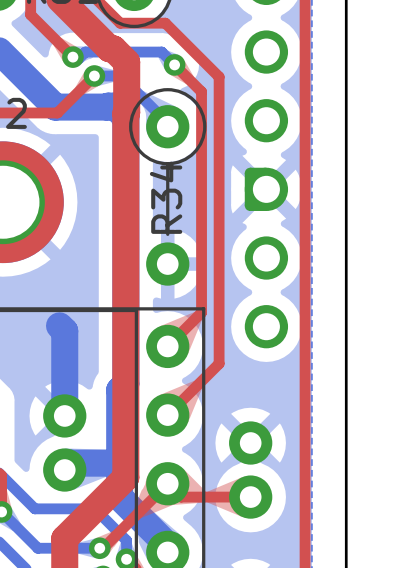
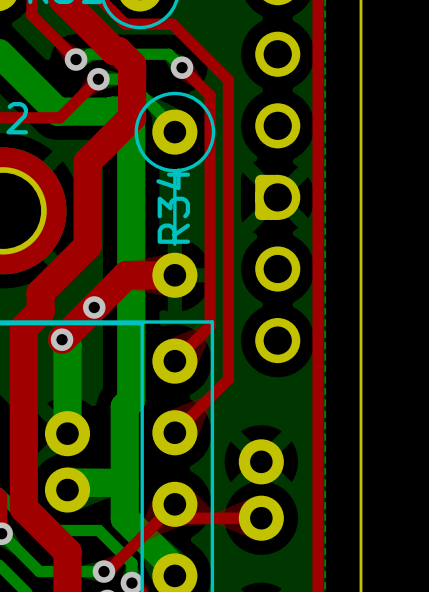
top track: (125, 113) (125, 477) (64, 538) -> (131, 118) (87, 161) (87, 245) (40, 292) (40, 311) (23, 328) (23, 508) (67, 551) (67, 561)
top track: none -> (174, 275) (126, 275) (62, 339)
via: none -> (94, 307)
via: none -> (62, 339)

